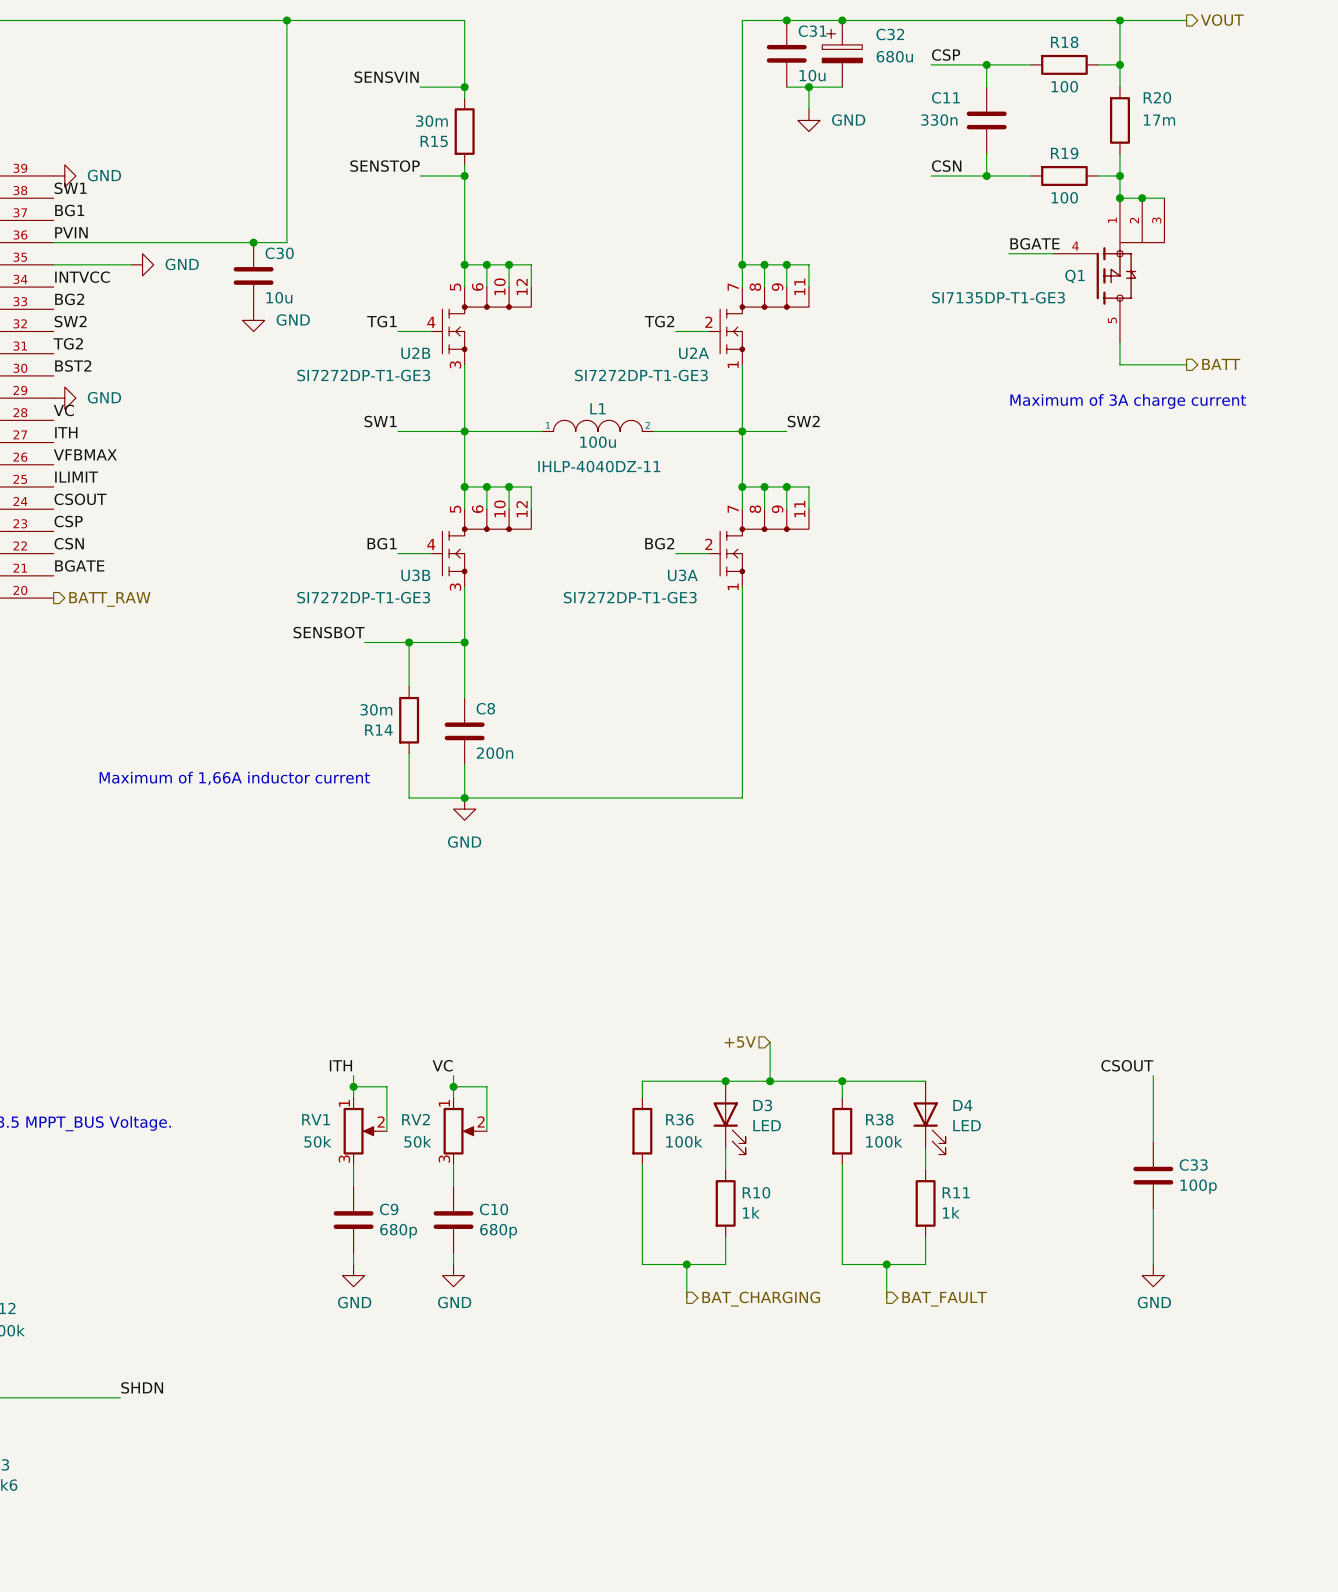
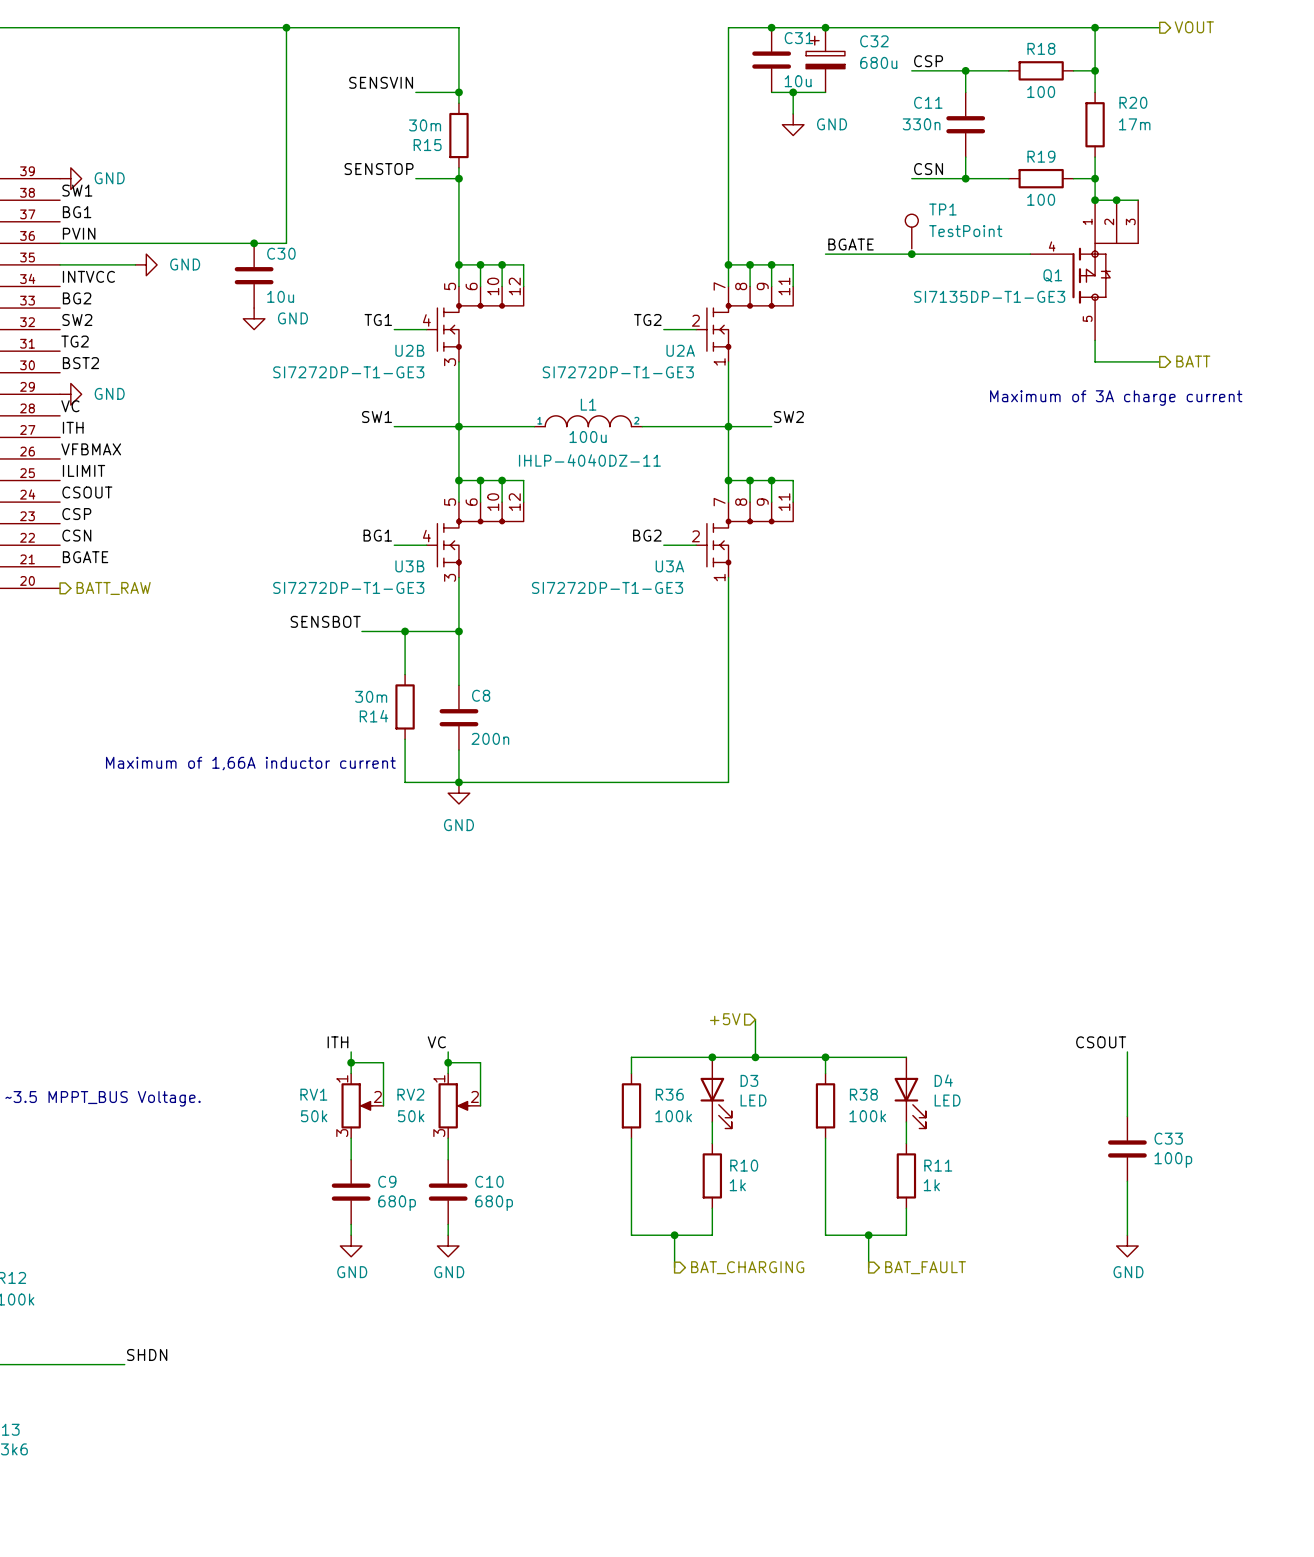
TP1: none -> TestPoint (911, 231)
label position: BGATE (1034, 243) -> BGATE (851, 244)
wire: none -> (825, 254) (987, 254)
junction: none -> (911, 254)

